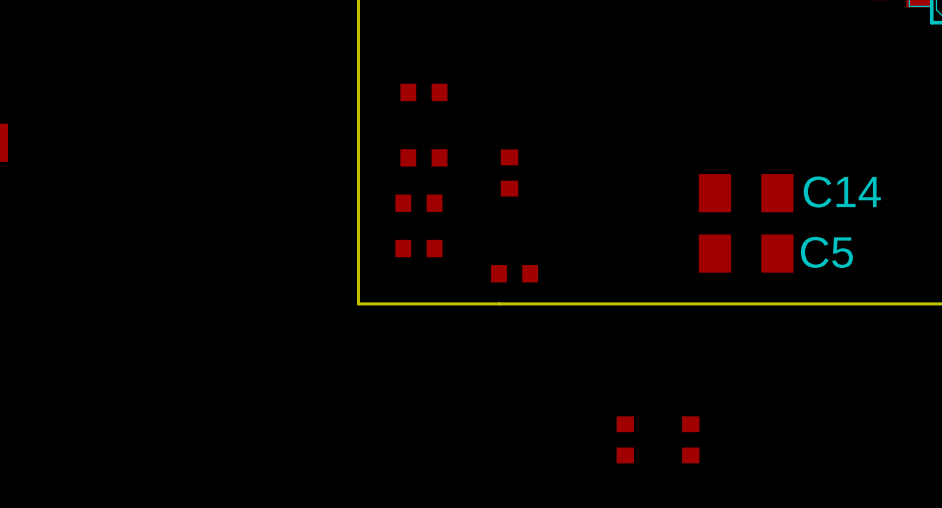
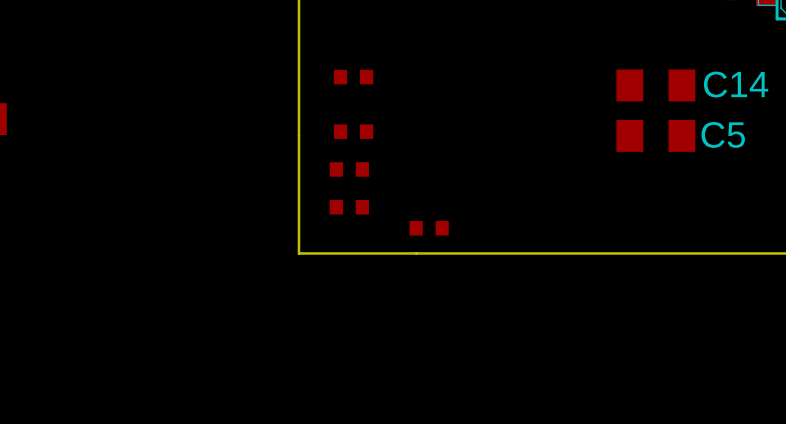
part: (509, 173) -> none
C14 position: (746, 193) -> (655, 85)
C5 position: (746, 253) -> (655, 135)
part: (625, 439) -> none
part: (690, 439) -> none

